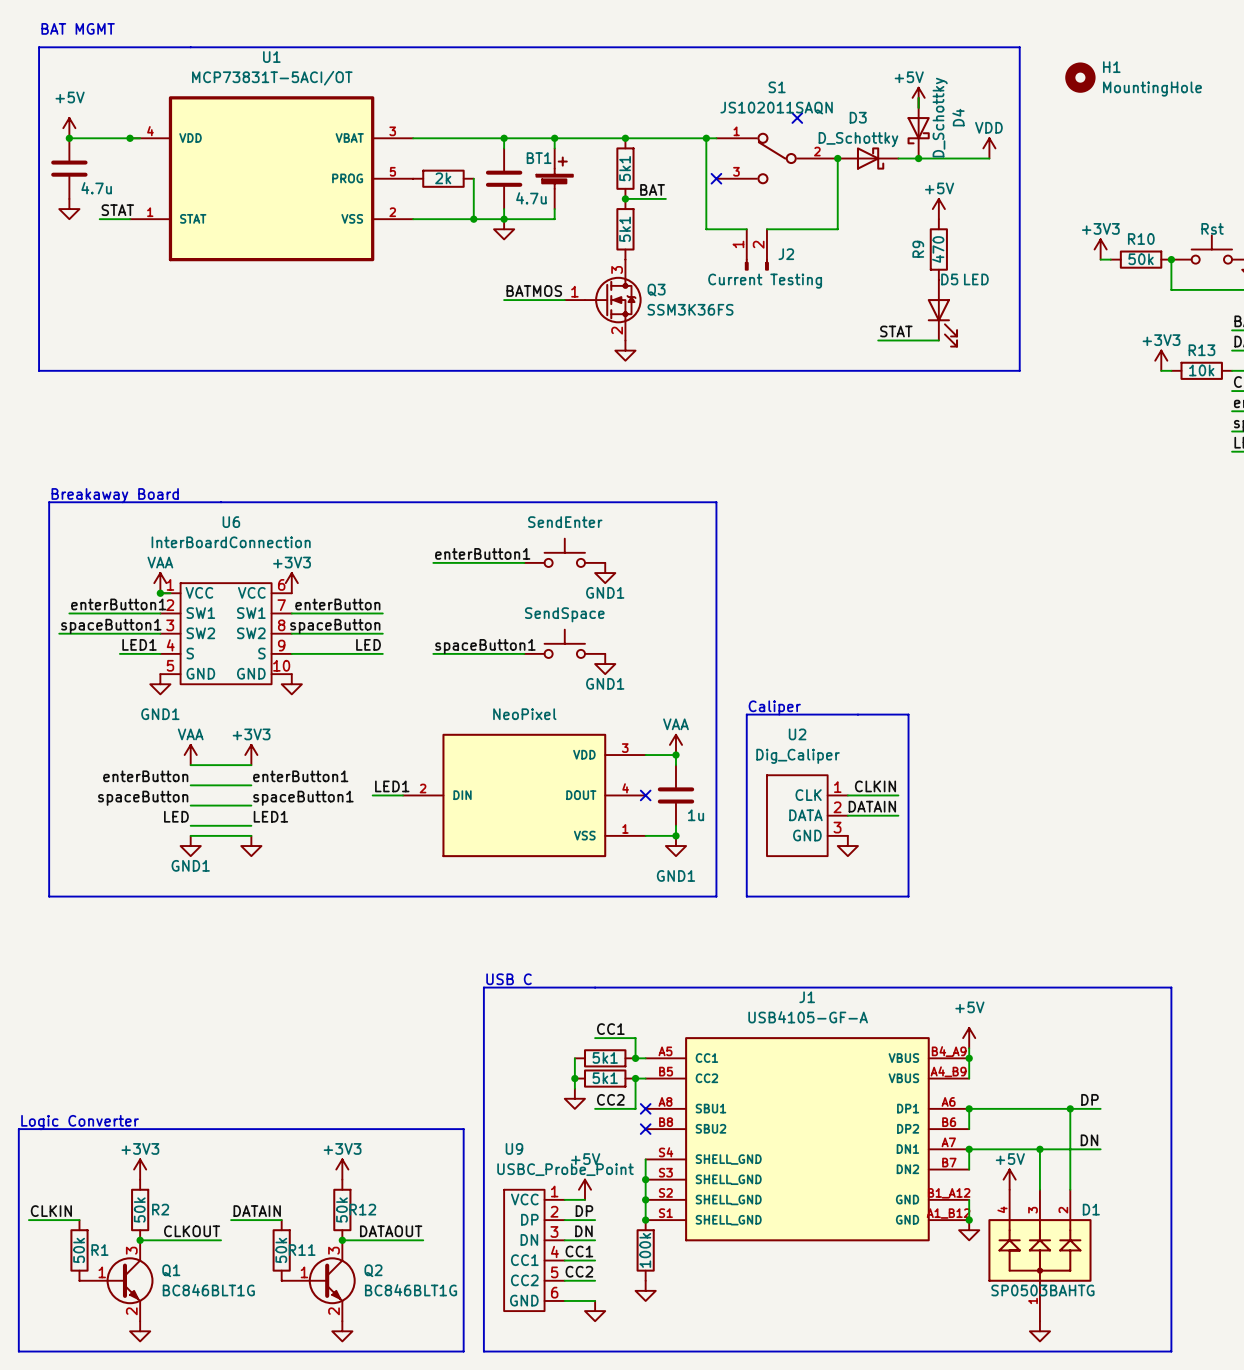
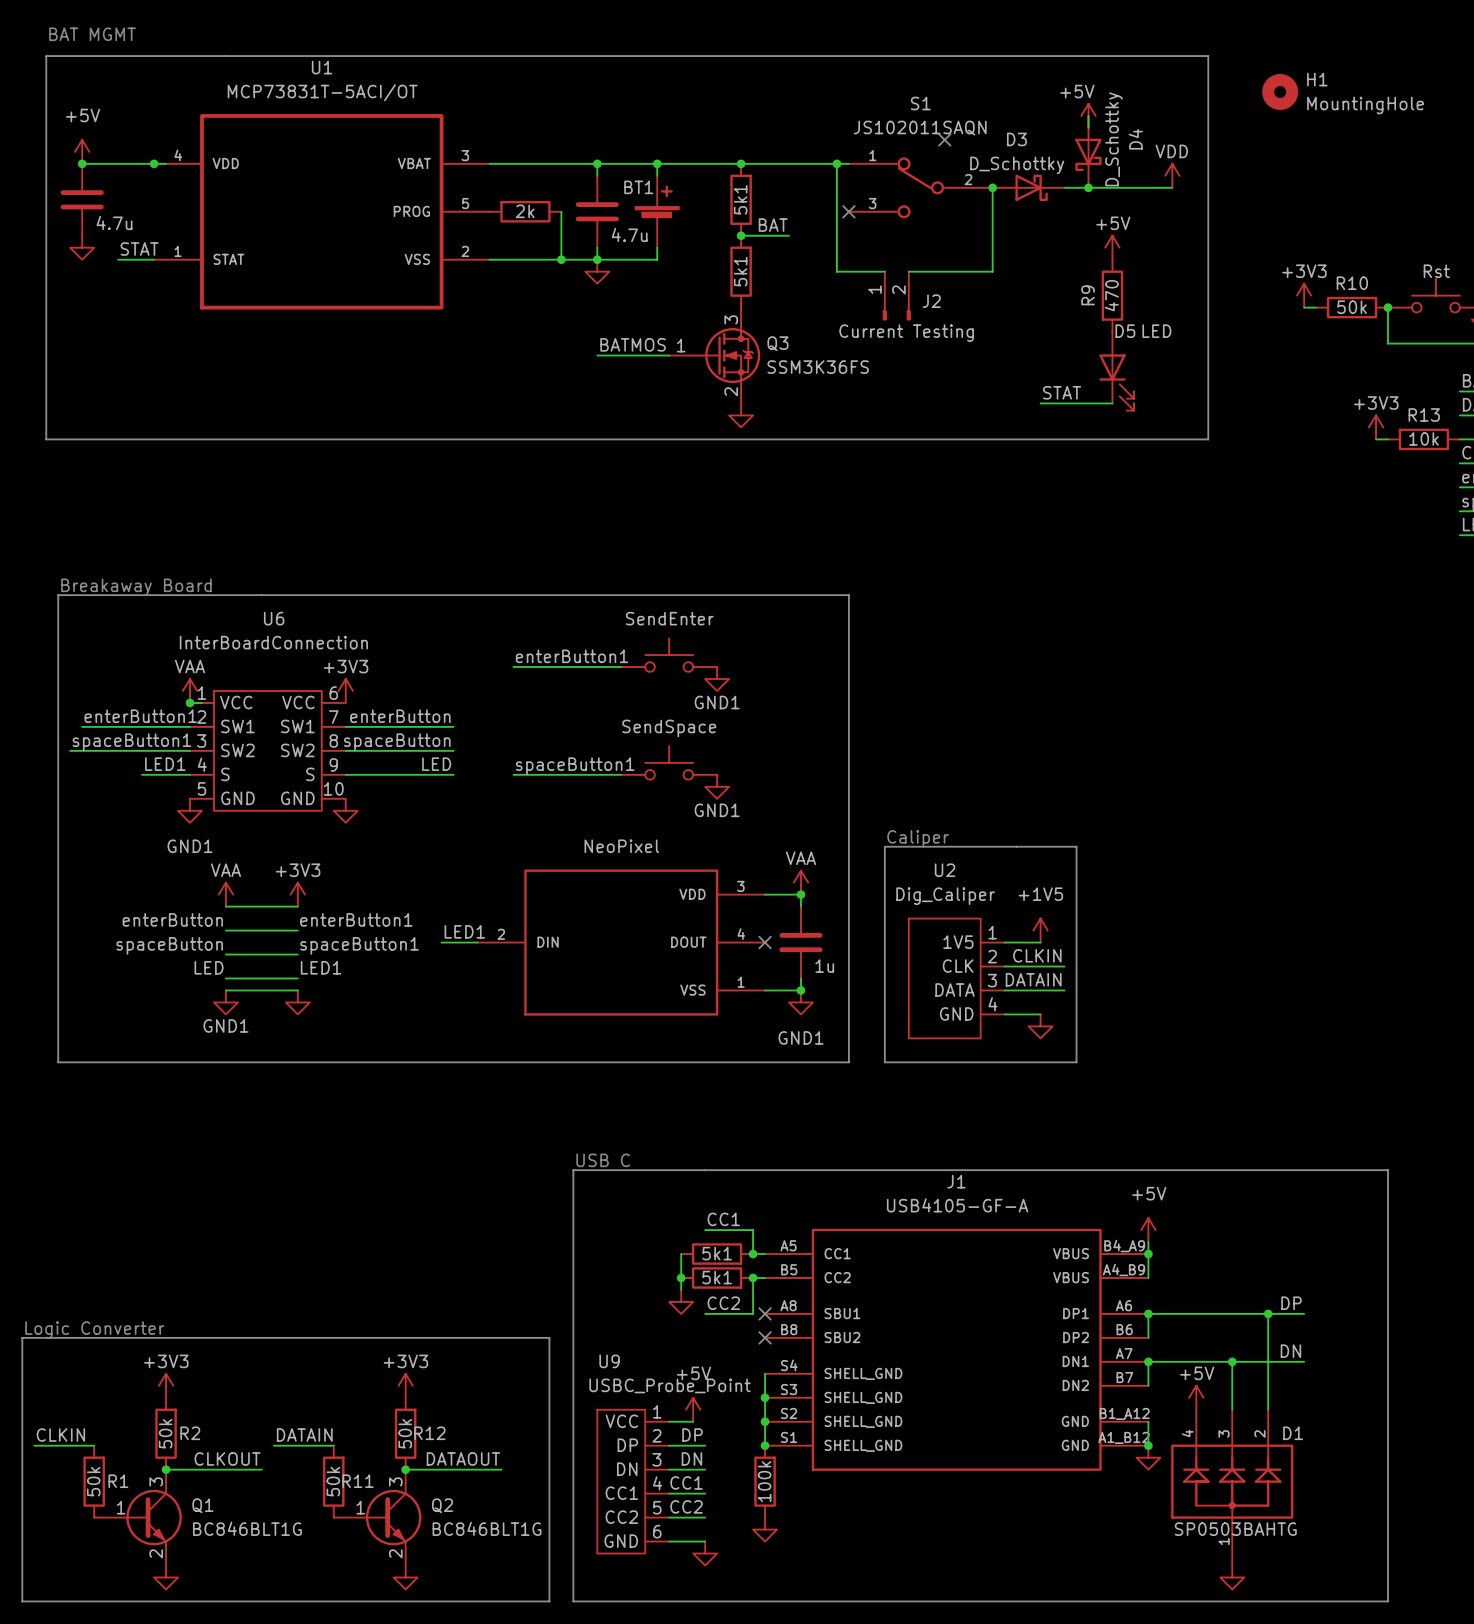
U2 symbol: [766, 775, 848, 857] -> [908, 918, 1005, 1039]
power symbol: none -> +1V5 (1040, 930)
label: CLKIN (875, 786) -> none
wire: (878, 795) (898, 795) -> none
label: DATAIN (872, 806) -> CLKIN (1037, 955)
label: none -> DATAIN (1033, 979)
wire: none -> (1004, 990) (1064, 990)
power symbol position: (847, 846) -> (1040, 1026)
wire: none -> (1004, 1014) (1040, 1014)

